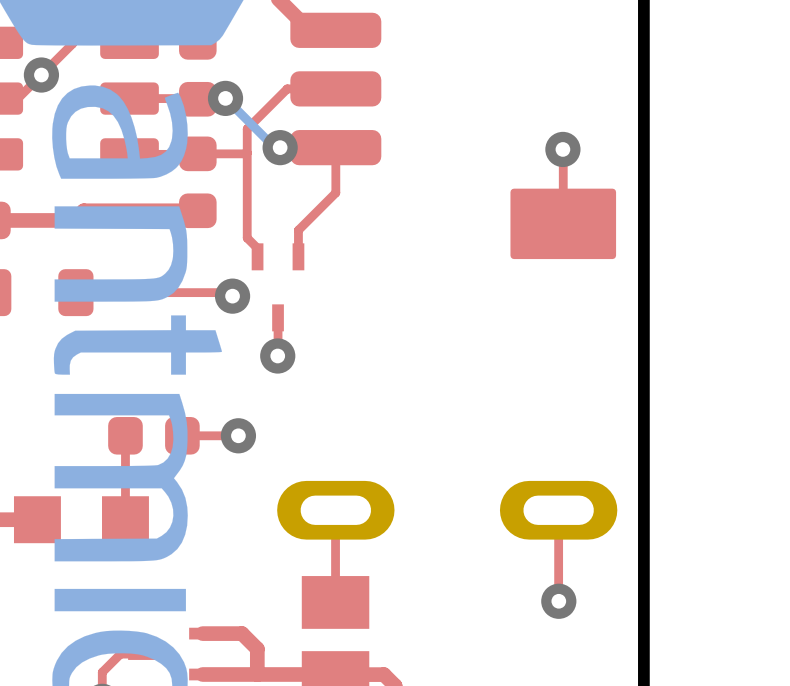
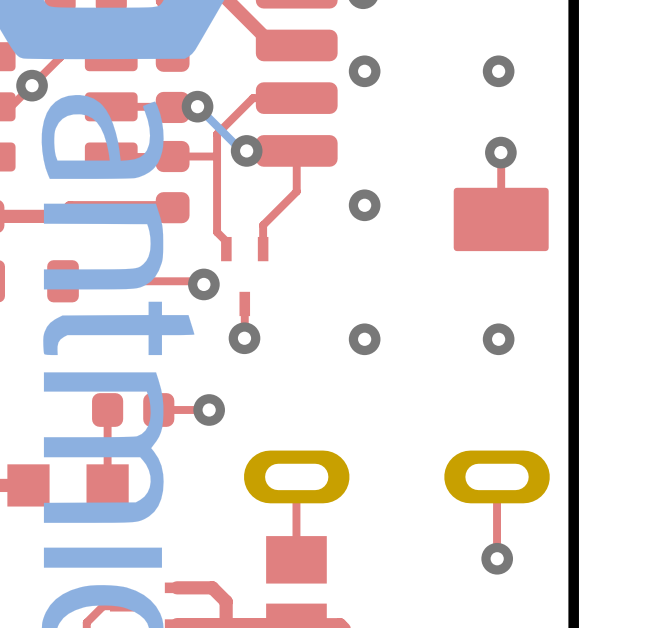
via: none -> (364, 71)
via: none -> (498, 71)
via: none -> (364, 205)
via: none -> (364, 339)
via: none -> (498, 339)

